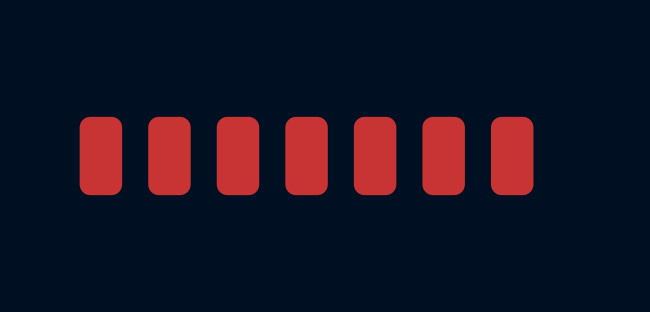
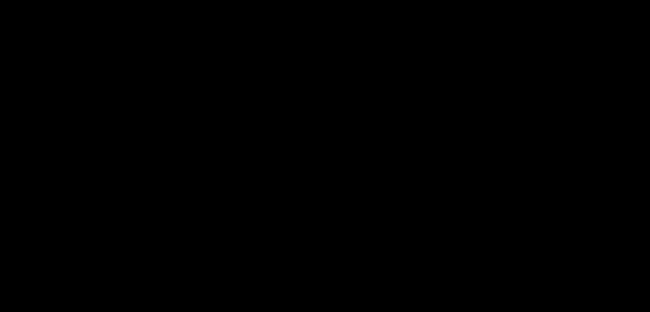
part: (306, 155) -> none

